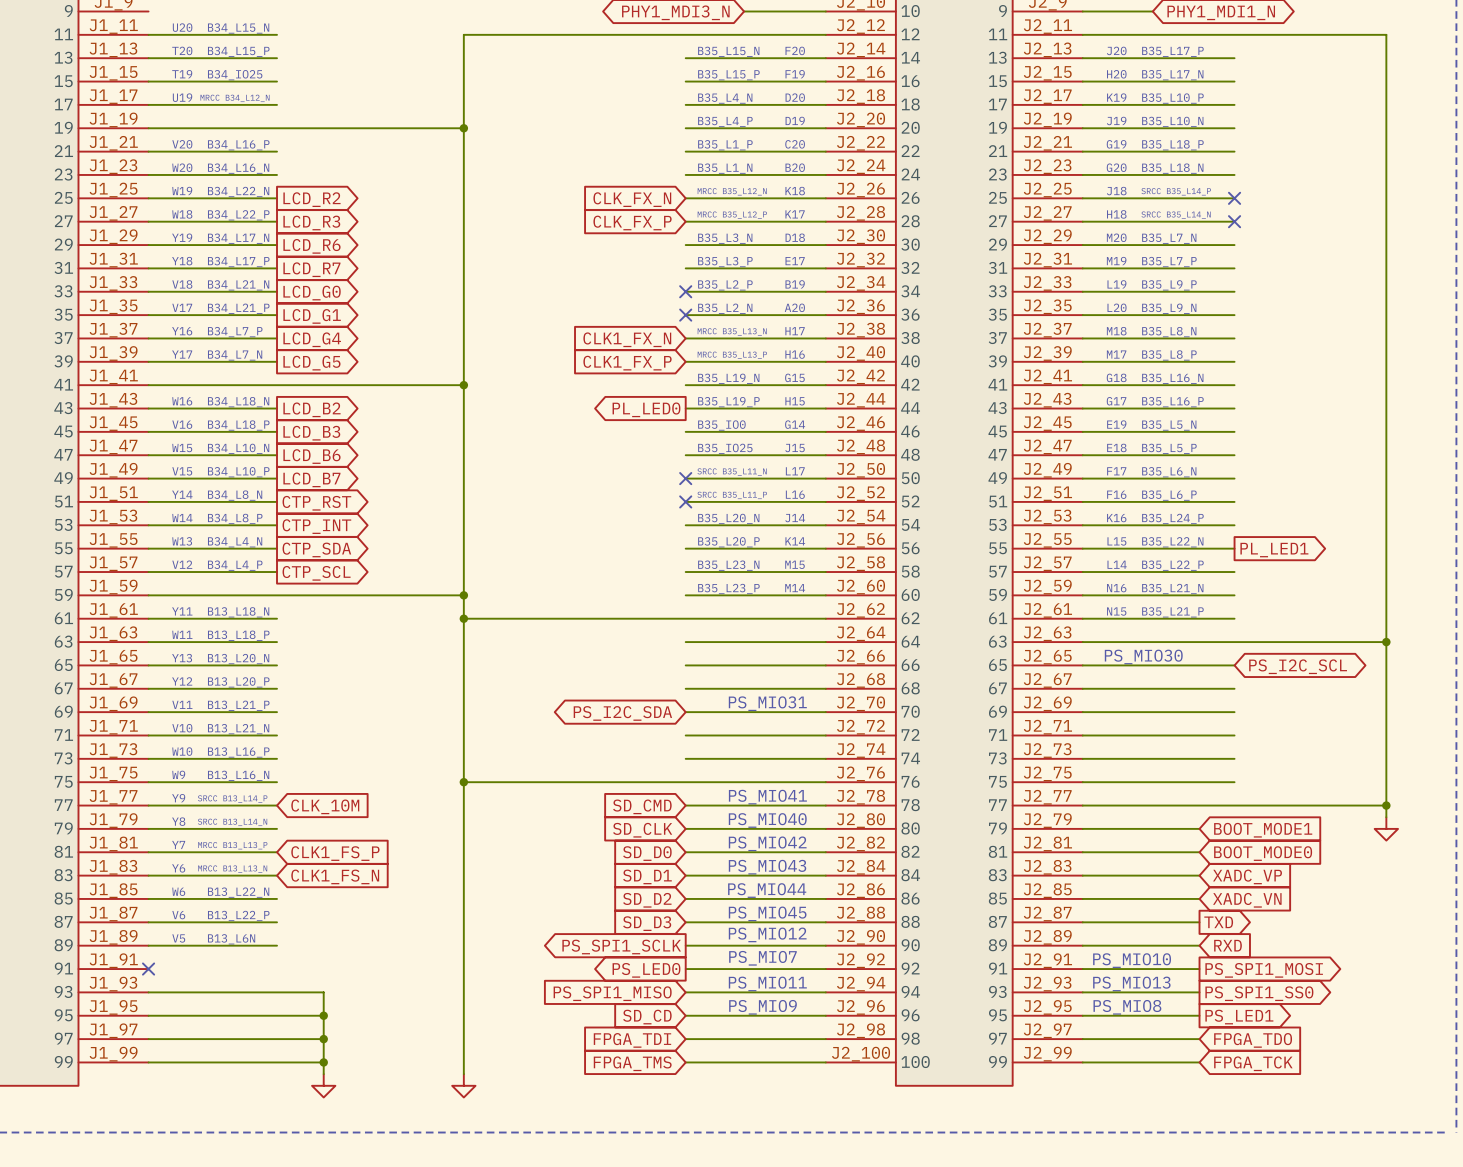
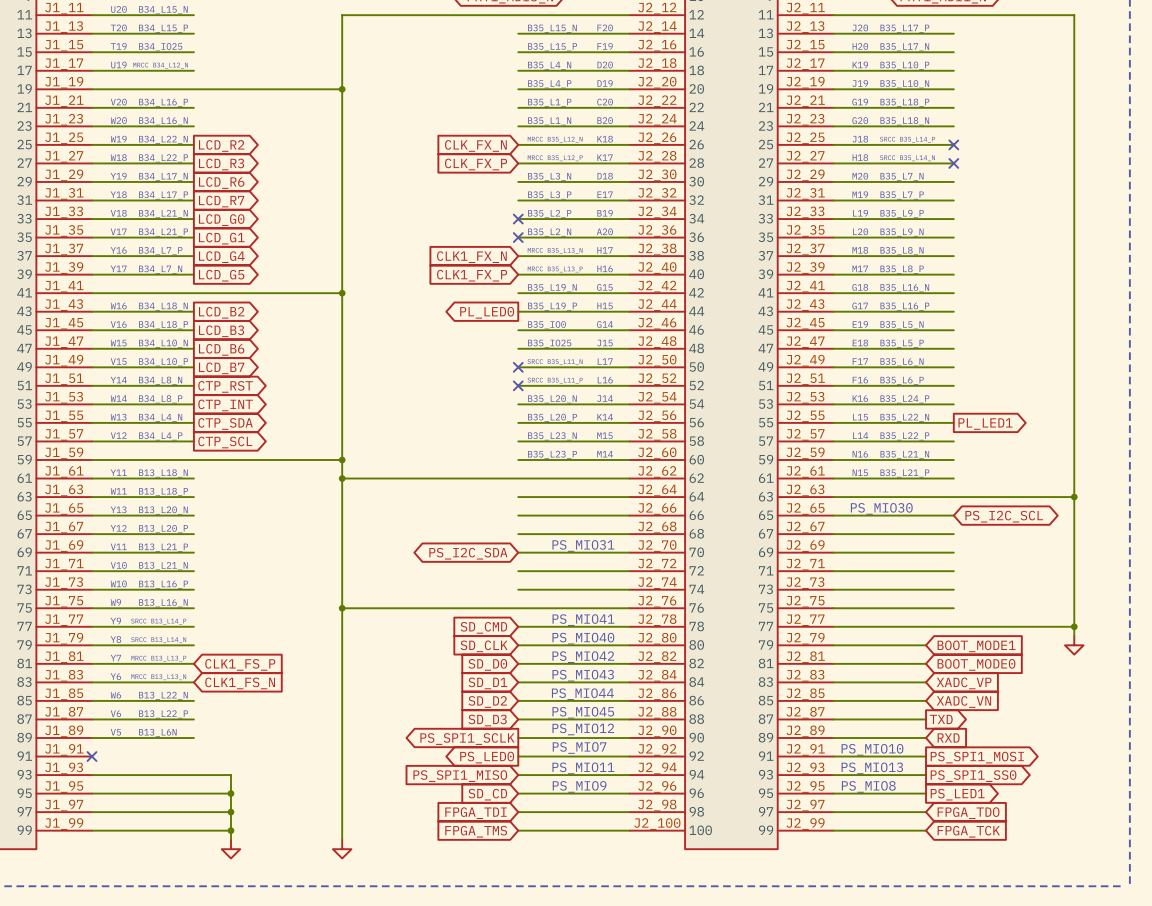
global label: CLK_10M (325, 806) -> none

